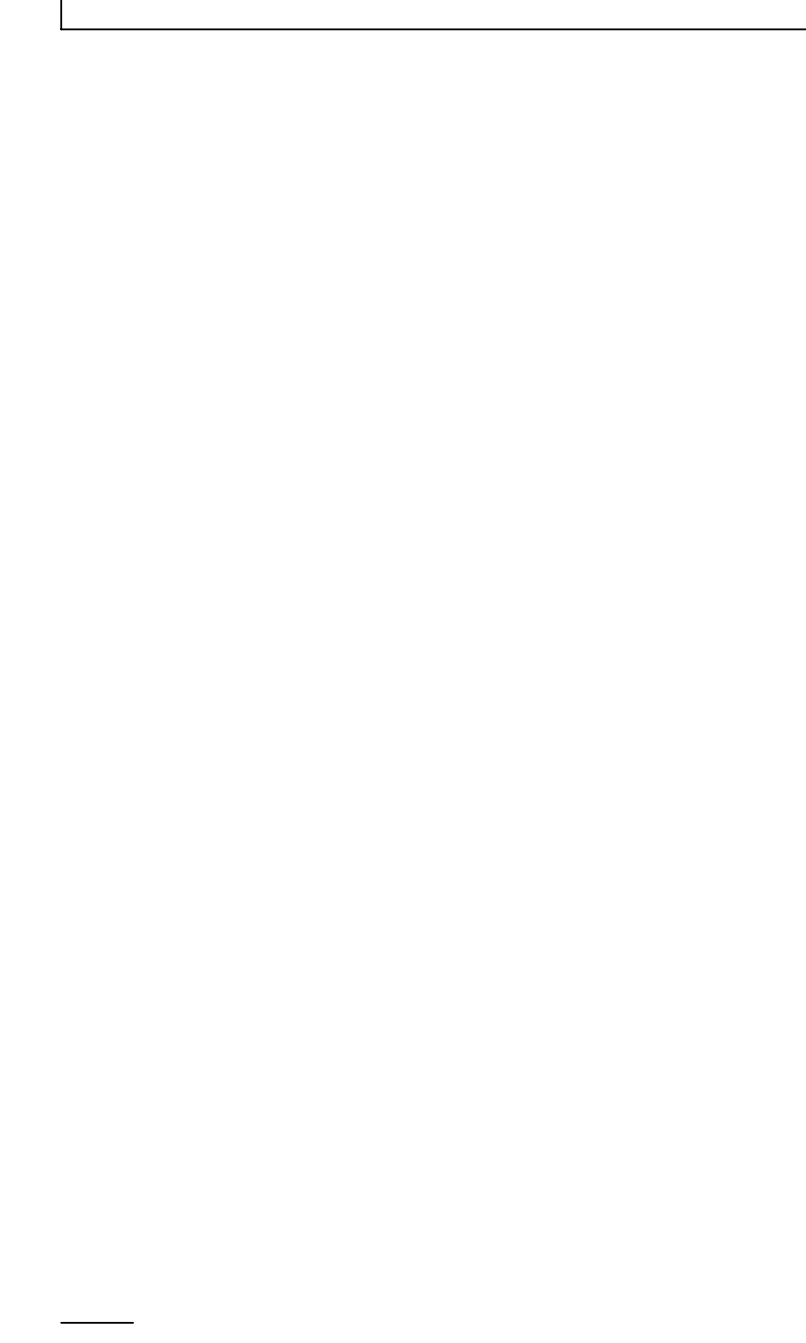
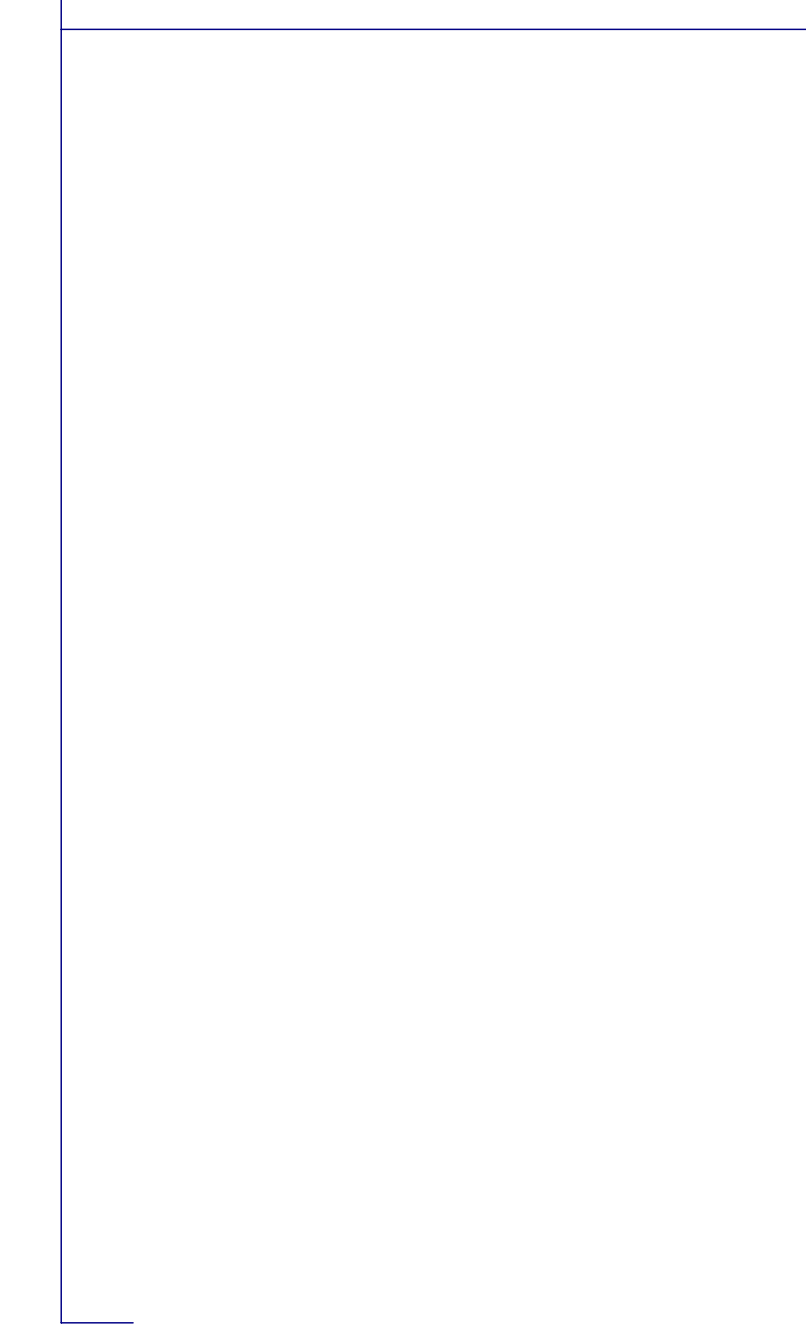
line: none -> (61, 29) (61, 1322)

